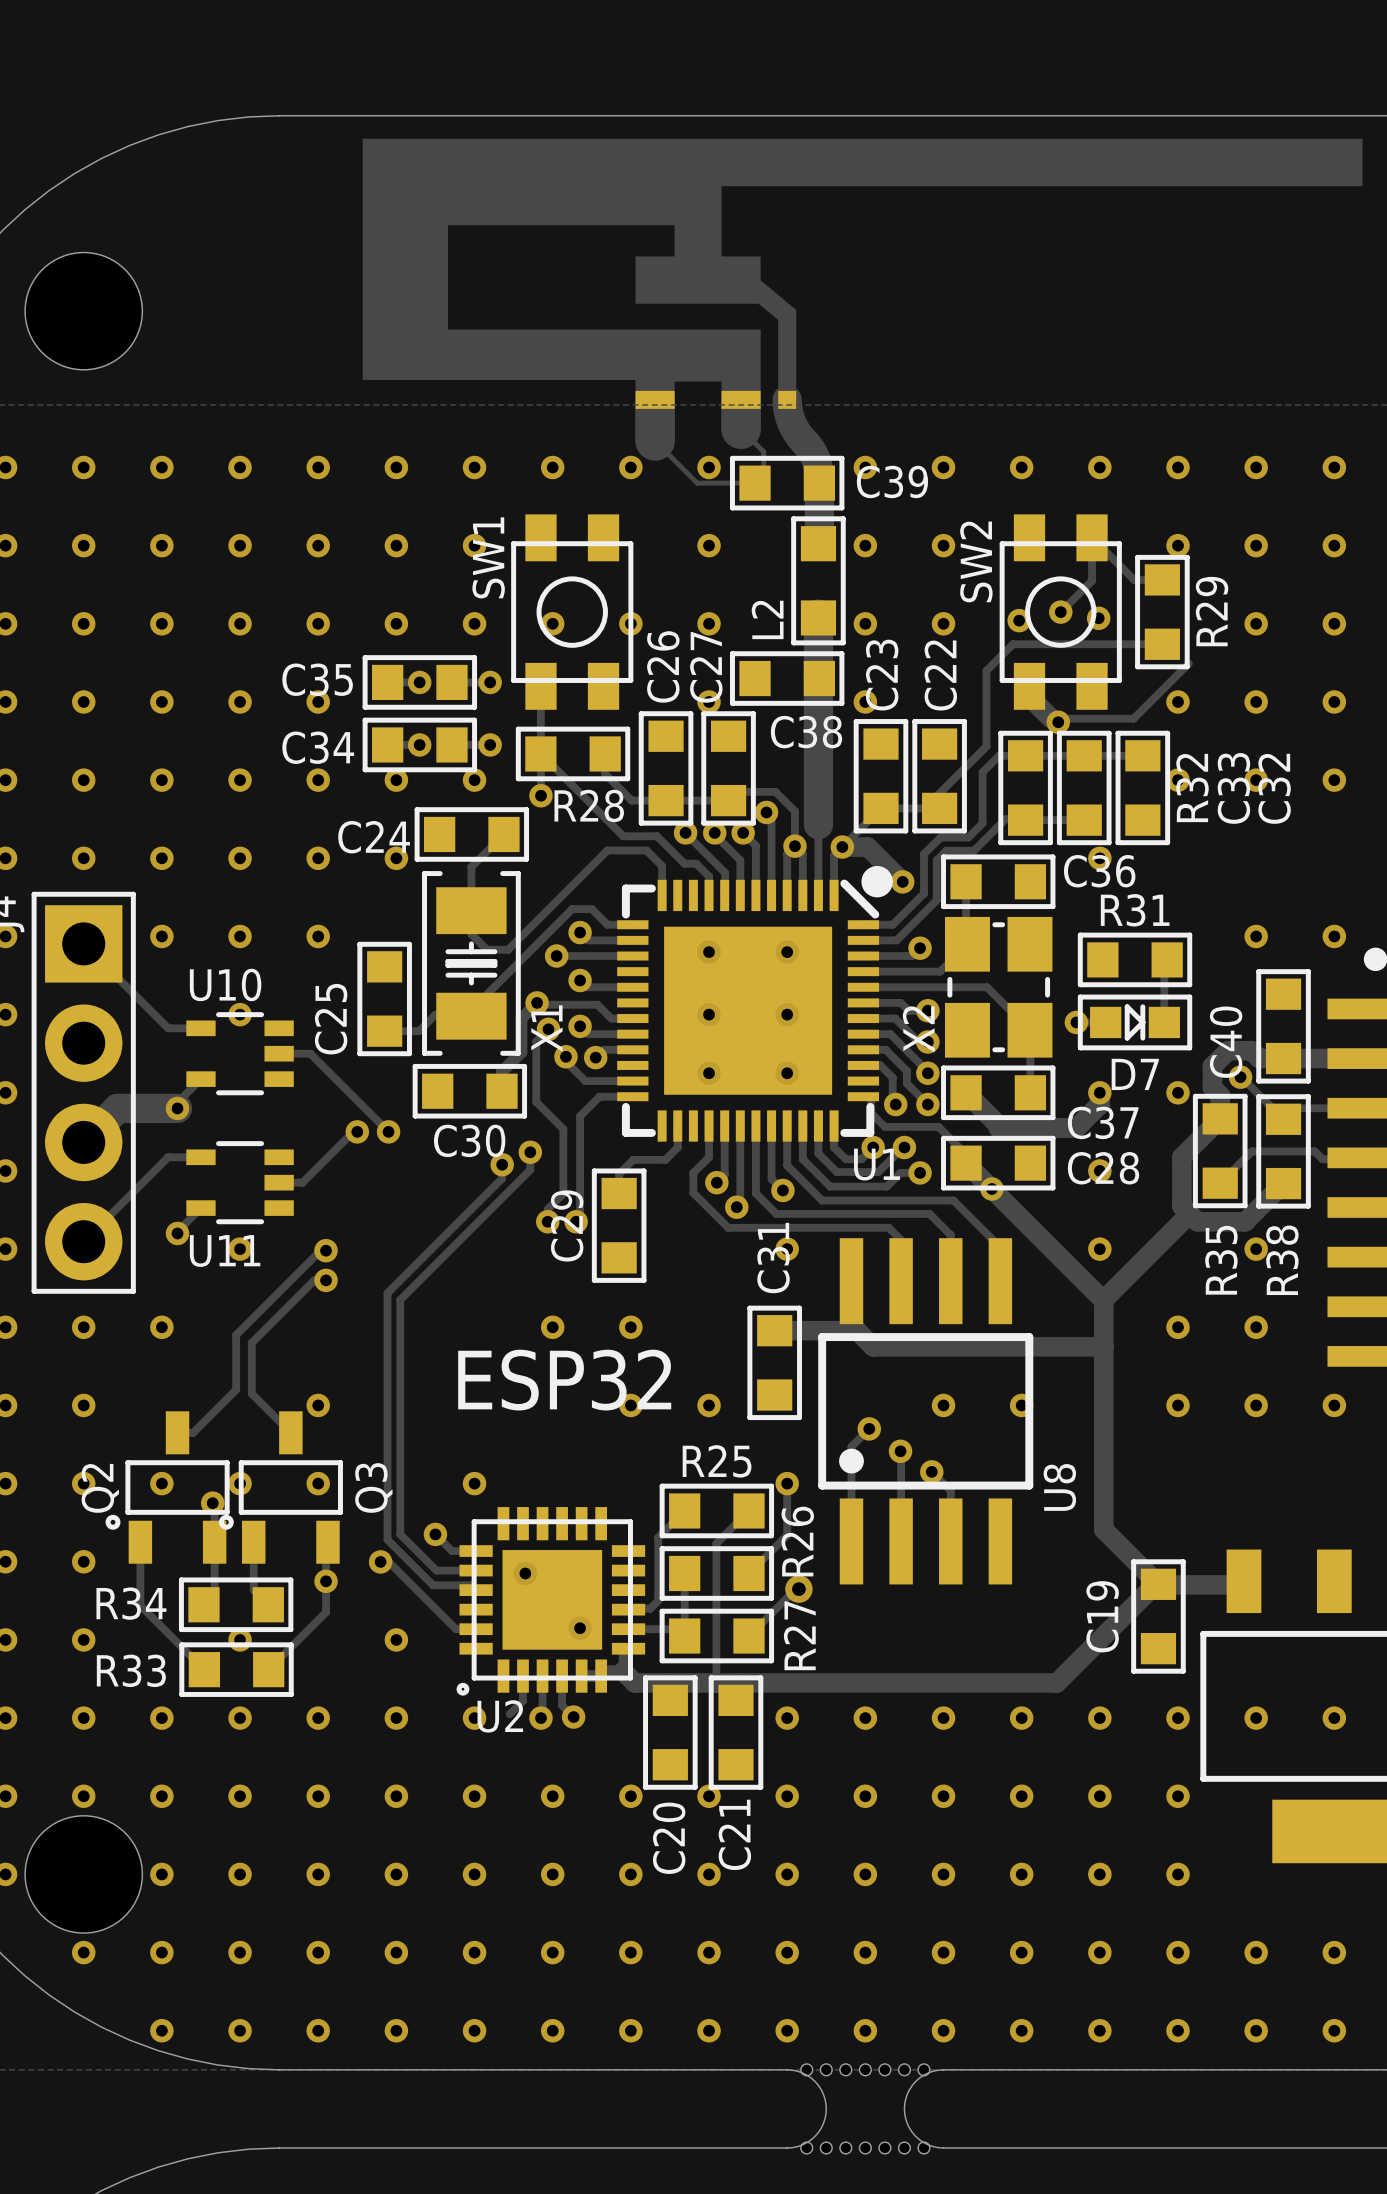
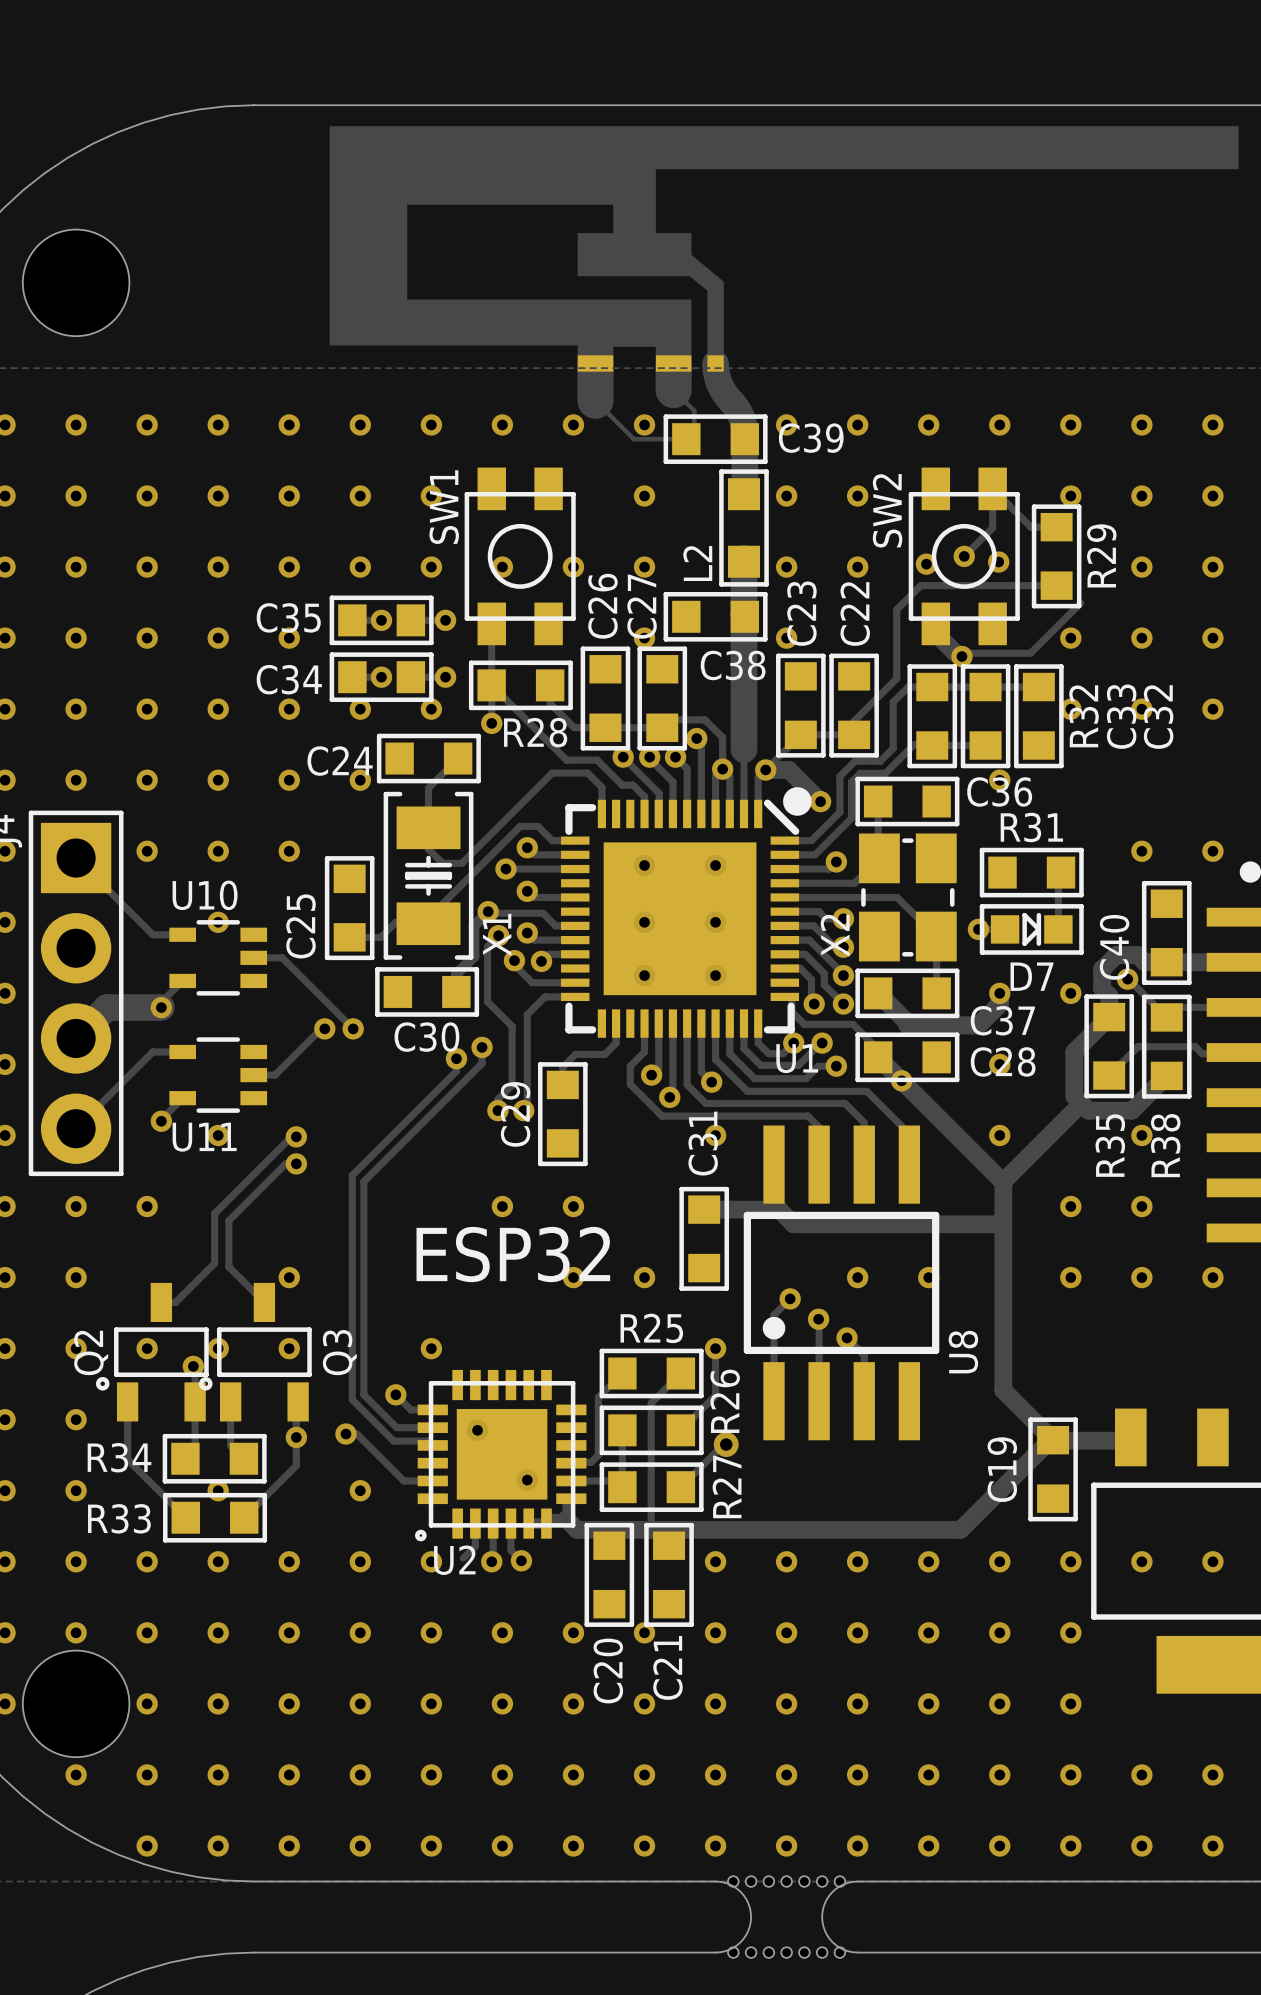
track: (380, 1561) (388, 1561) (455, 1629) -> (345, 1434) (356, 1434) (403, 1480) (414, 1480)
via position: (380, 1561) -> (345, 1434)

